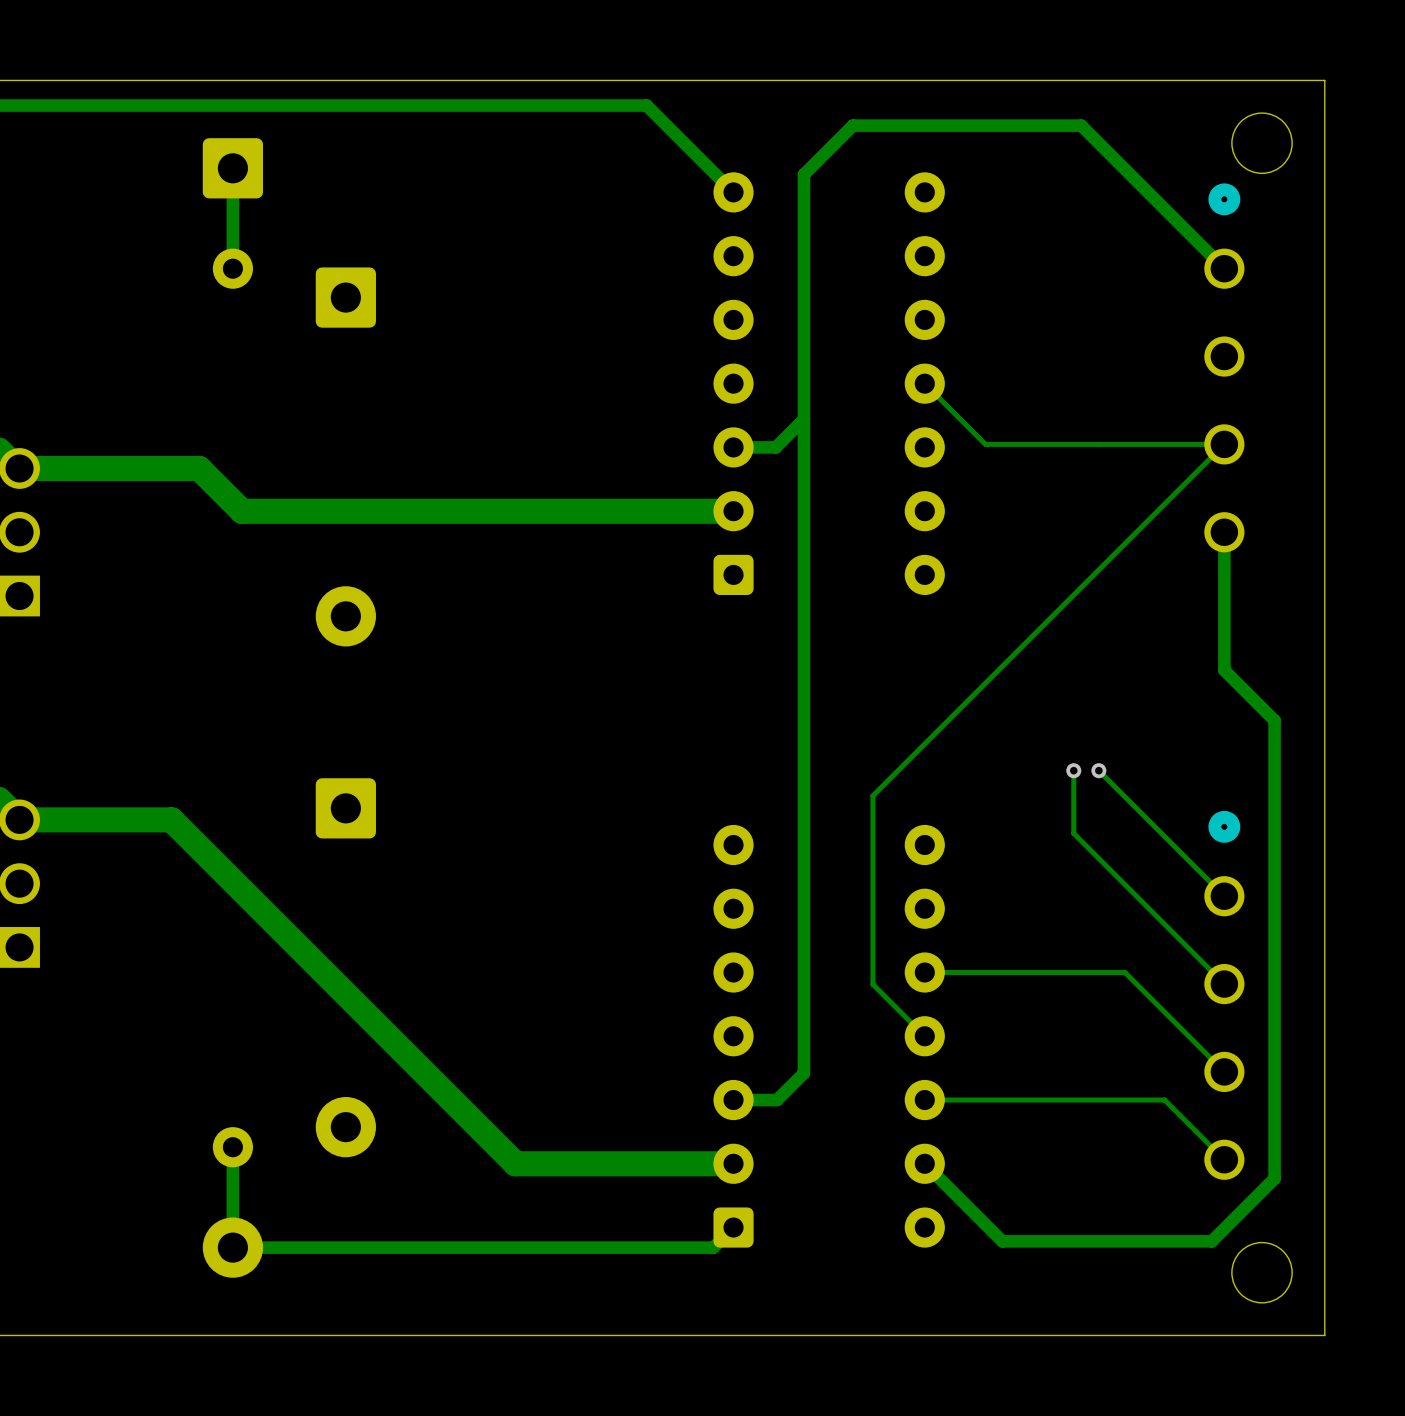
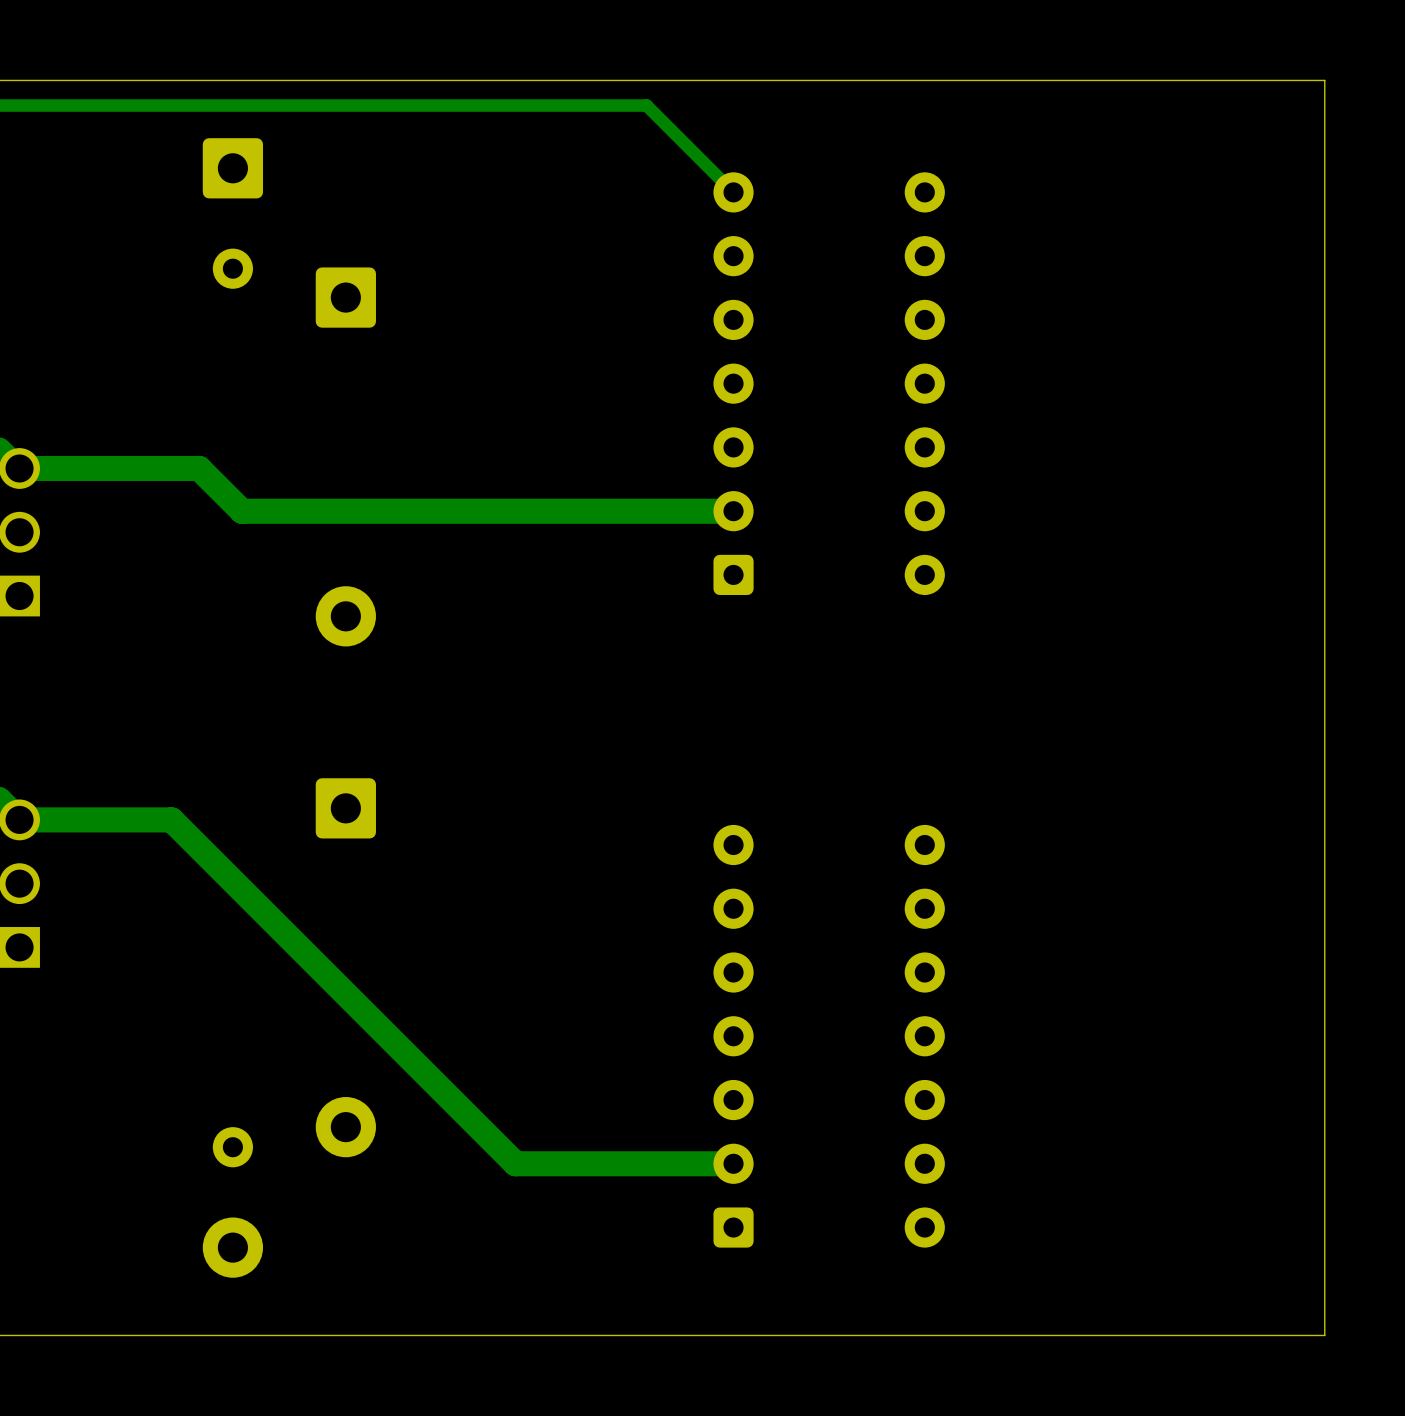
round board edge: [1231, 112, 1293, 174] -> none
track: (232, 168) (232, 268) -> none
track: (1224, 268) (1081, 125) (852, 125) (803, 174) (803, 1073) (777, 1100) (733, 1100) -> none
part: (1224, 367) -> none
track: (924, 383) (985, 444) (1224, 444) (872, 795) (872, 984) (924, 1036) -> none
track: (803, 419) (775, 447) (733, 447) -> none
track: (1224, 532) (1224, 670) (1274, 720) (1274, 1178) (1211, 1241) (1002, 1241) (924, 1163) -> none
track: (1073, 770) (1073, 833) (1224, 984) -> none
via: (1073, 770) -> none
track: (1098, 770) (1224, 896) -> none
via: (1098, 770) -> none
track: (924, 972) (1124, 972) (1224, 1071) -> none
part: (1224, 995) -> none
track: (924, 1100) (1164, 1100) (1224, 1159) -> none
track: (232, 1147) (232, 1247) (713, 1247) (733, 1227) -> none
round board edge: [1231, 1241, 1293, 1304] -> none

